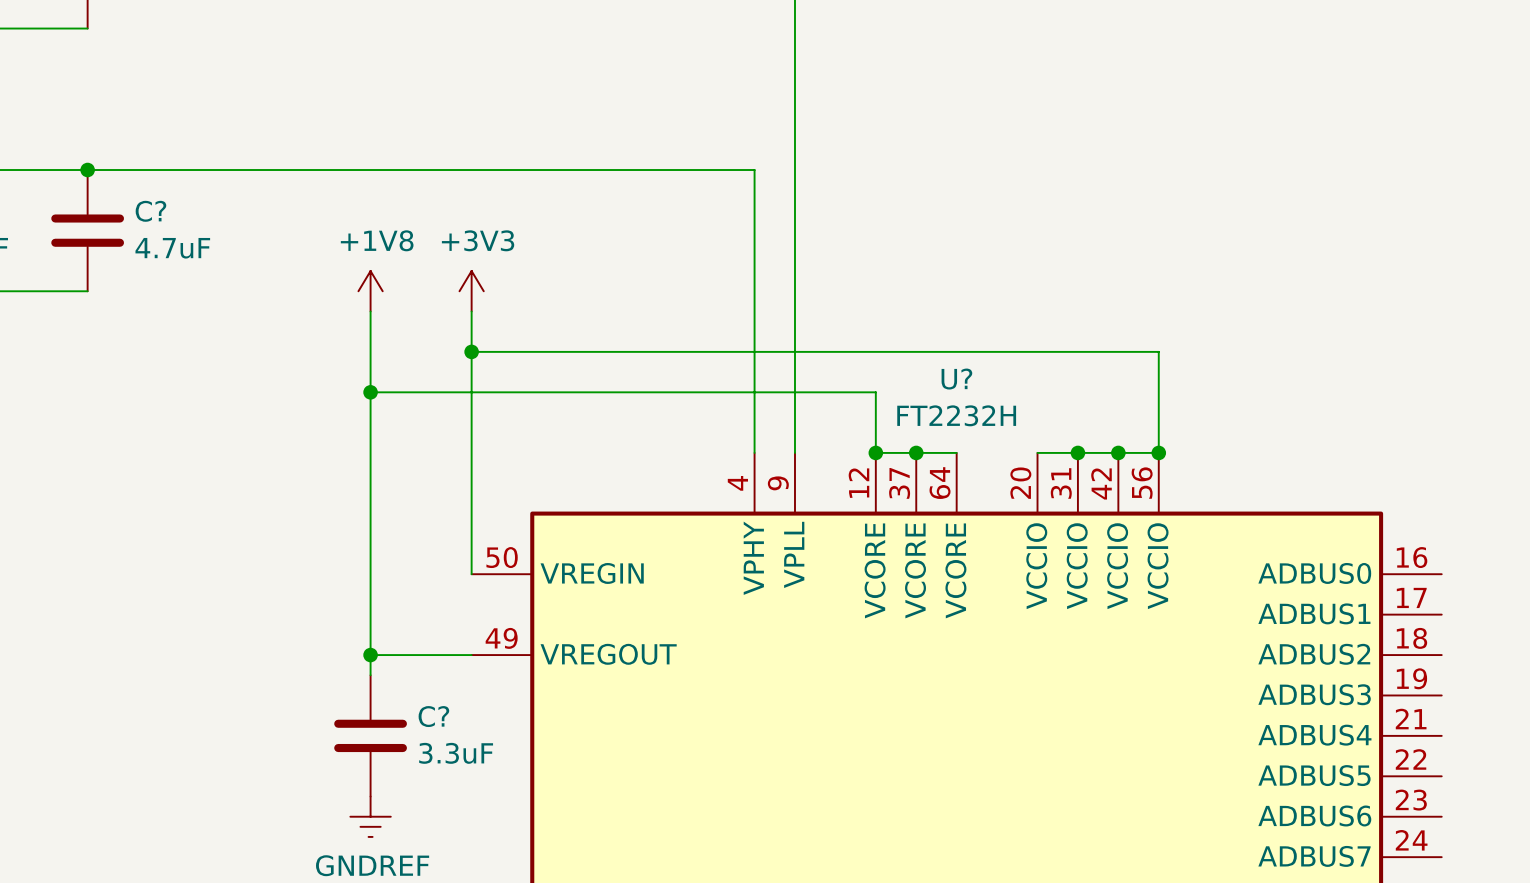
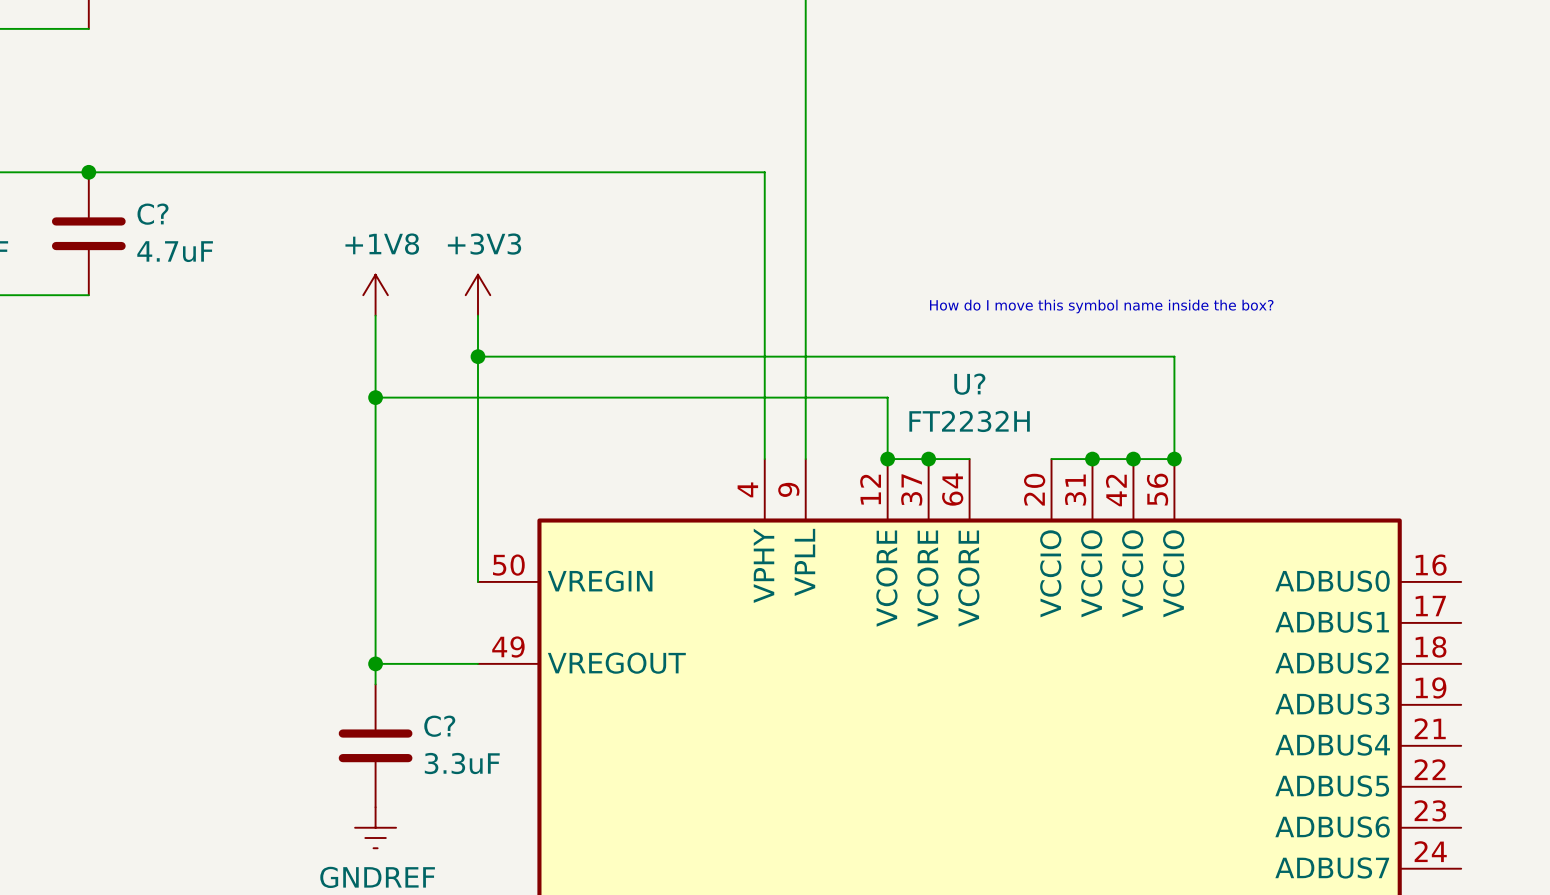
text: none -> How do I move this symbol name inside the box? (1101, 306)

